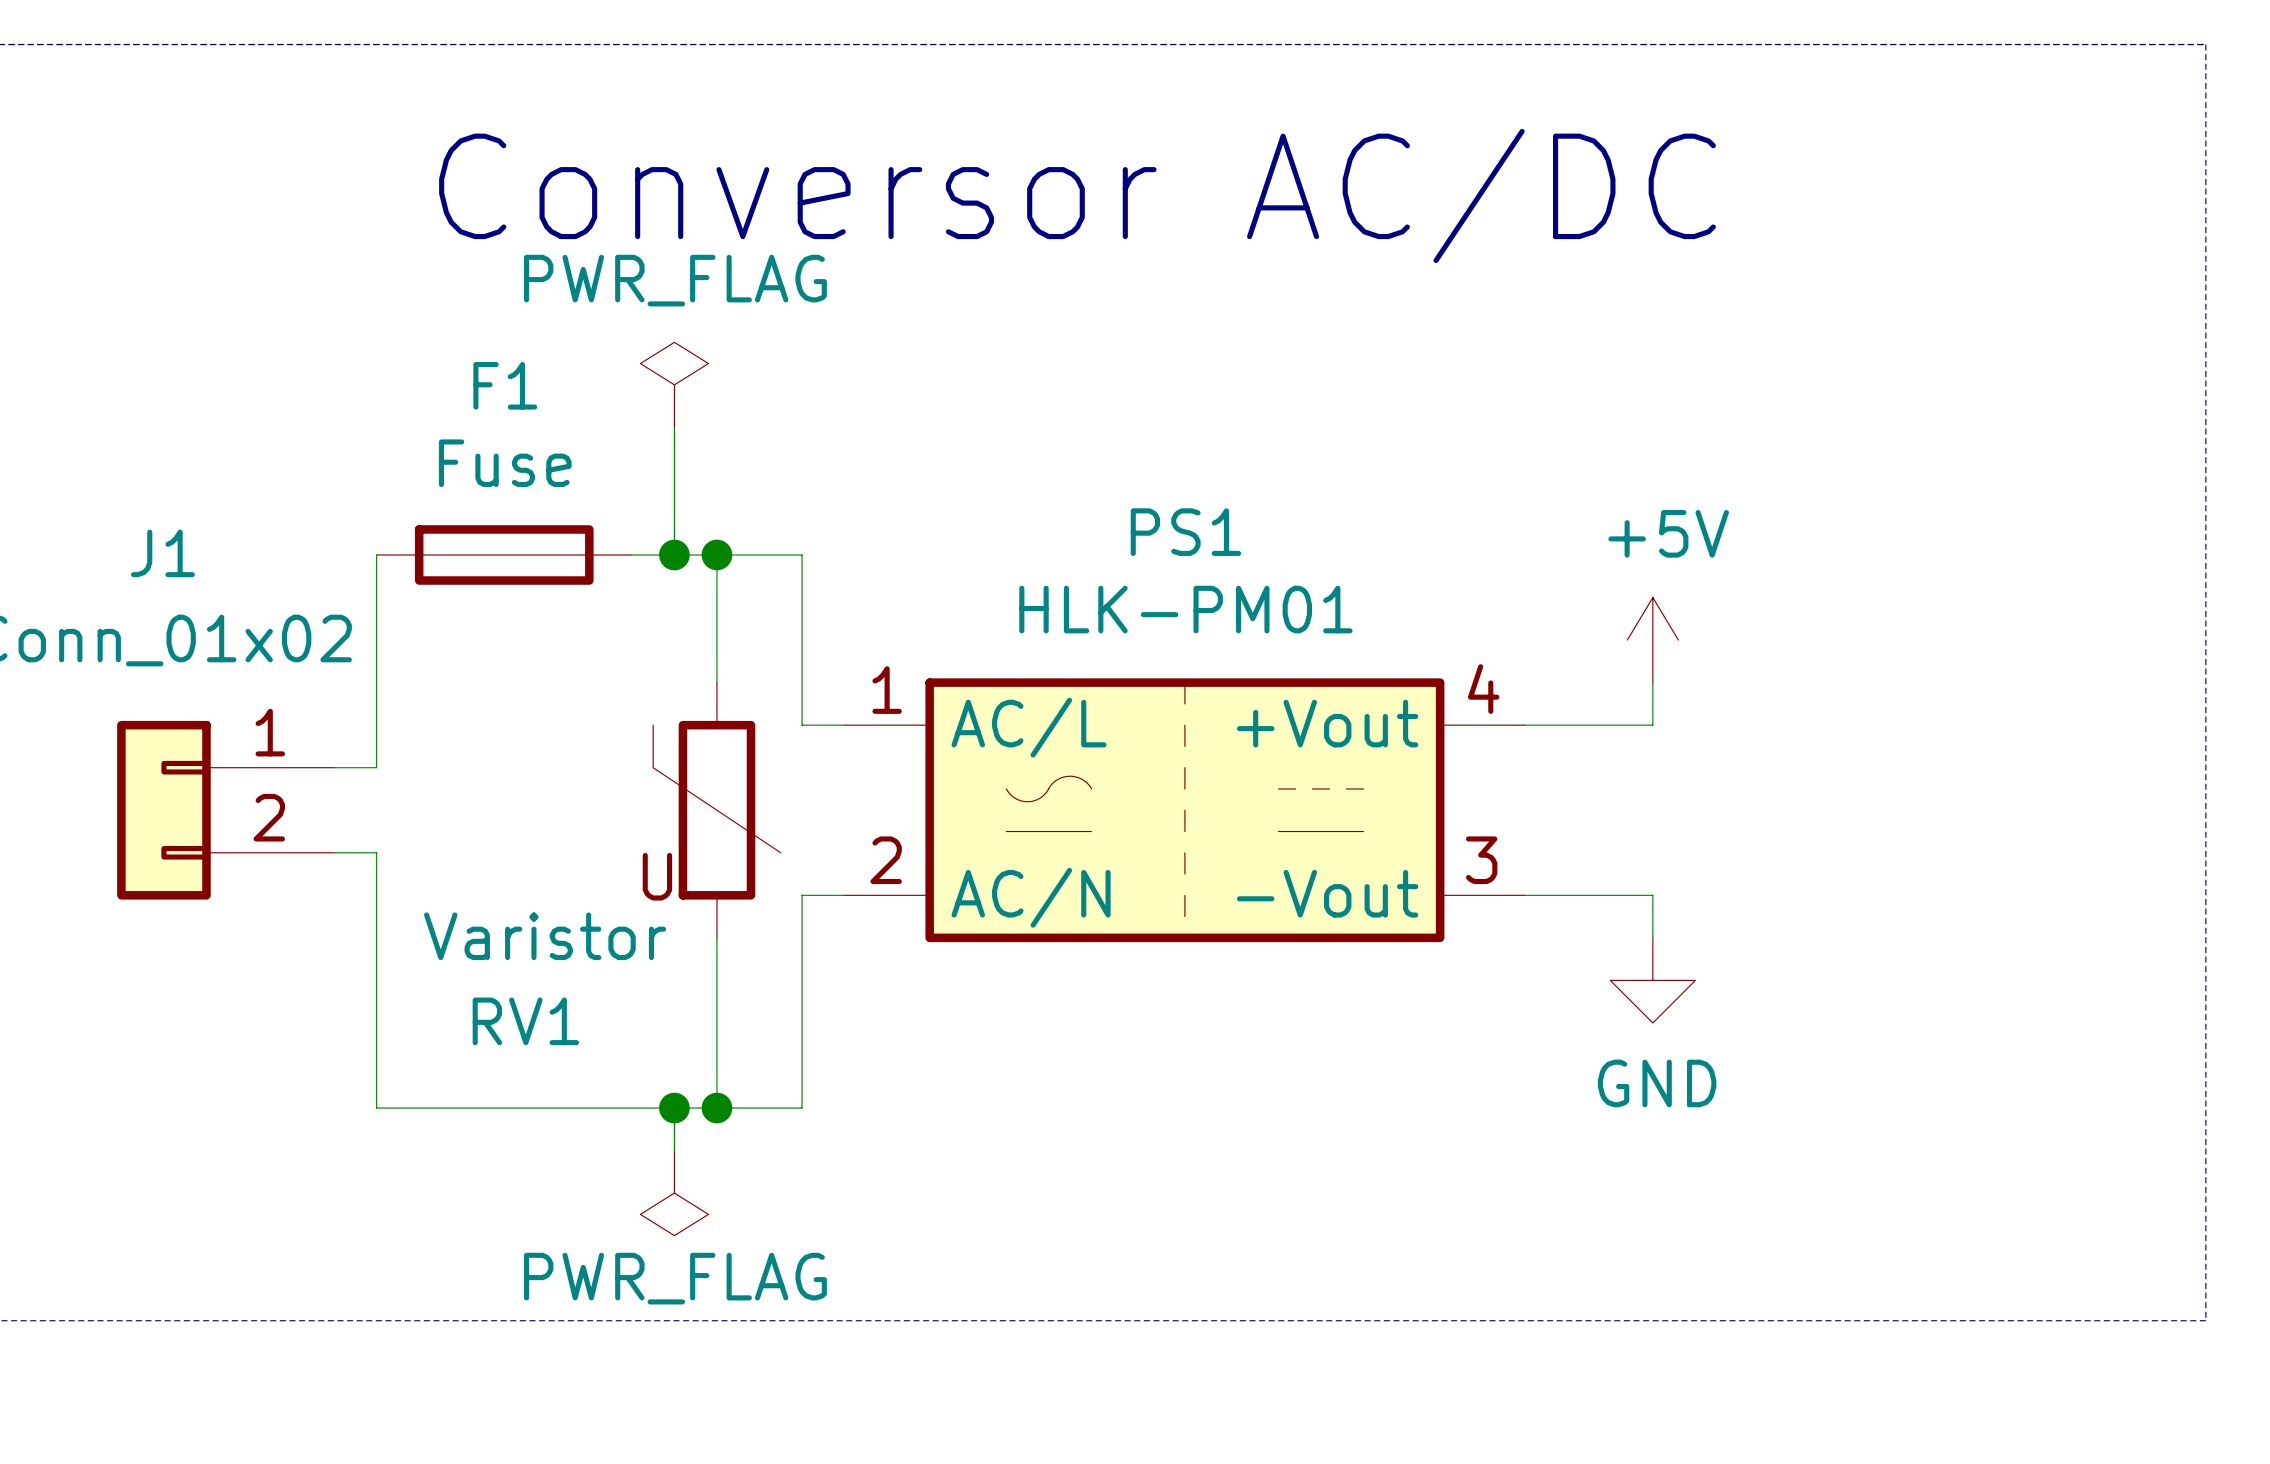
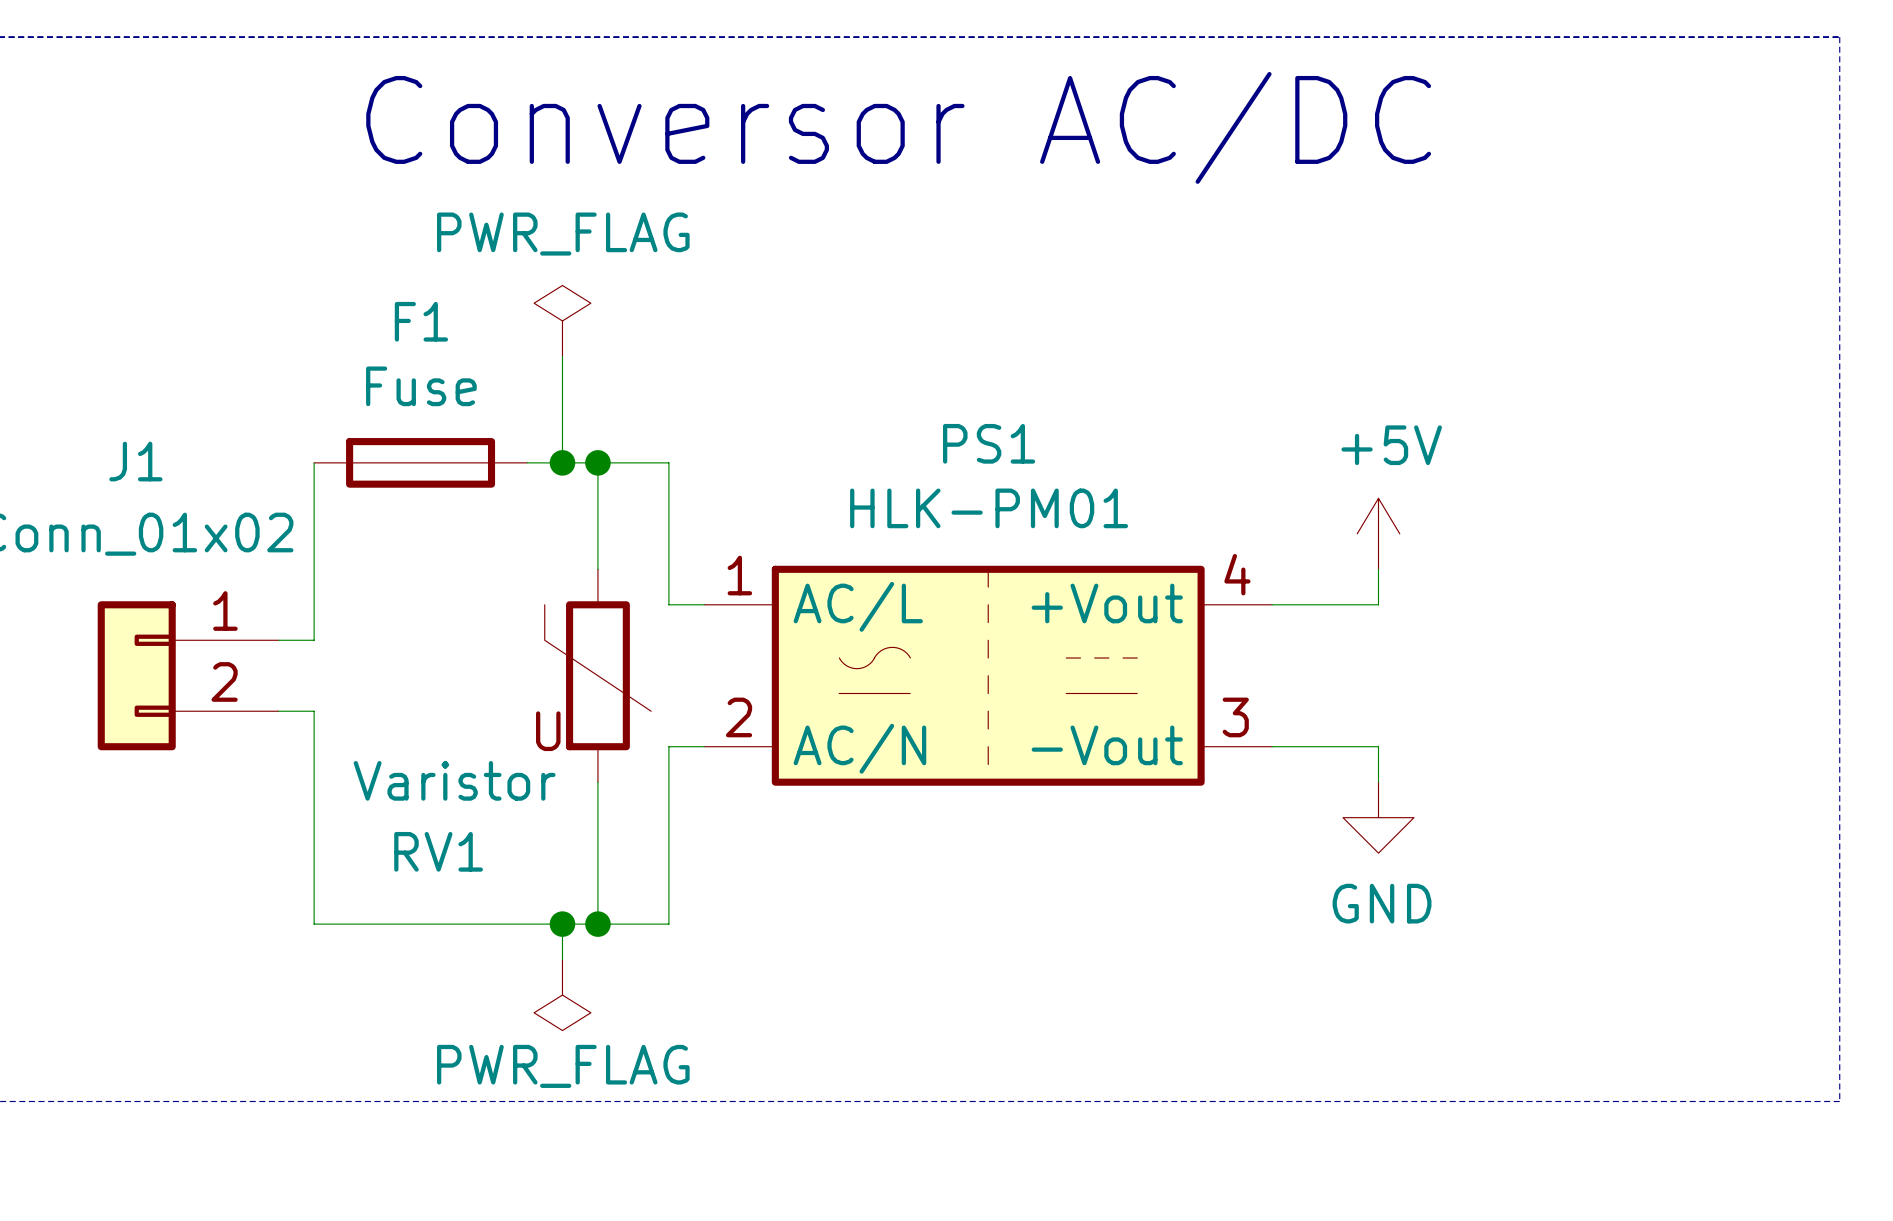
text position: Conversor AC/DC (1077, 195) -> Conversor AC/DC (898, 127)

